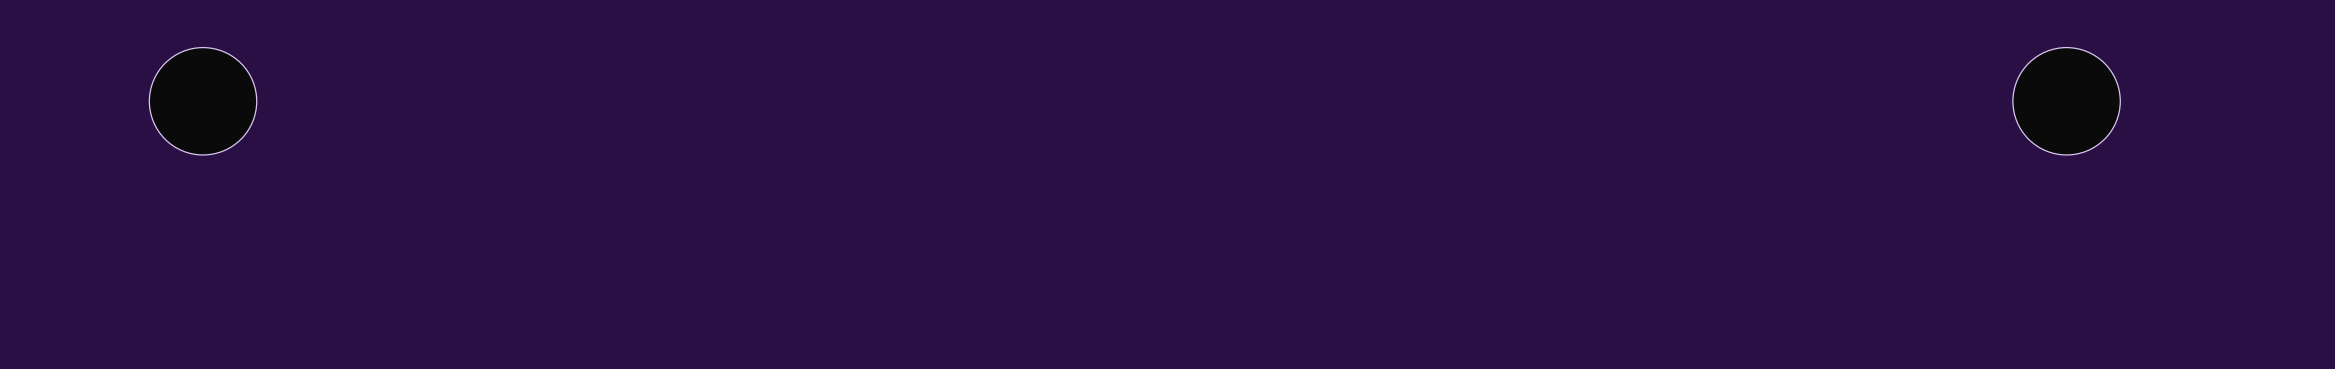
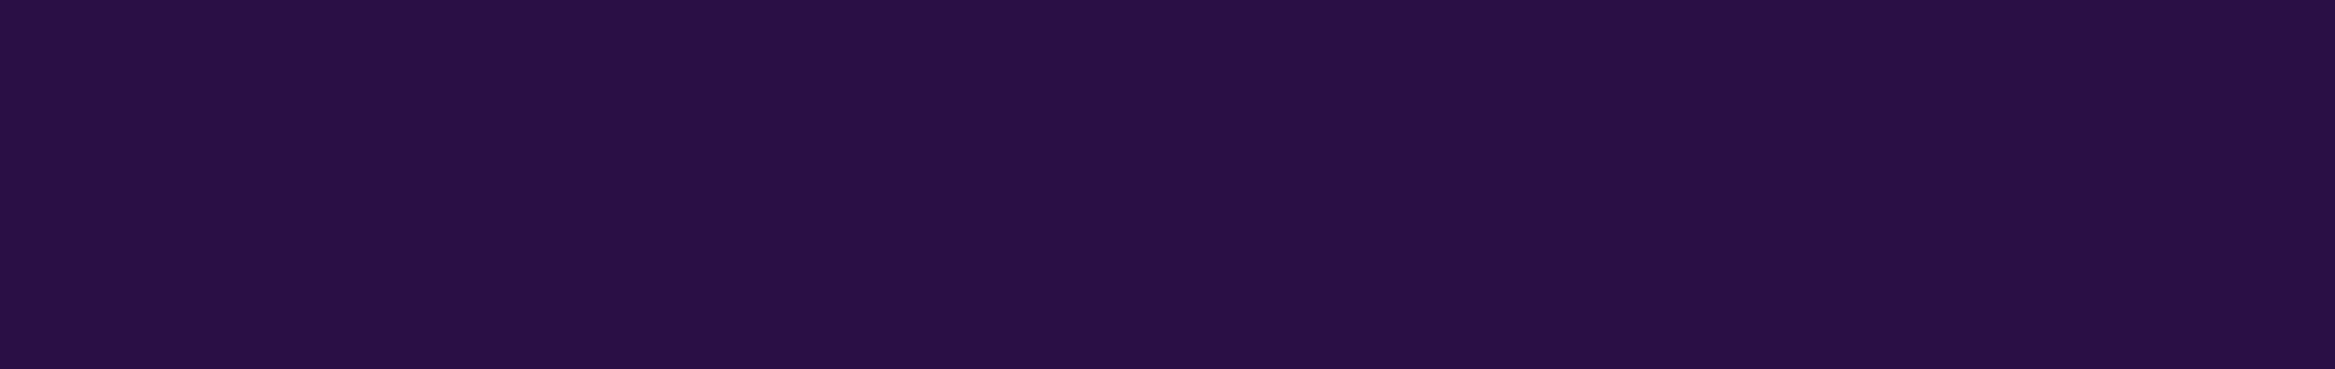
part: (203, 101) -> none
part: (2066, 101) -> none

